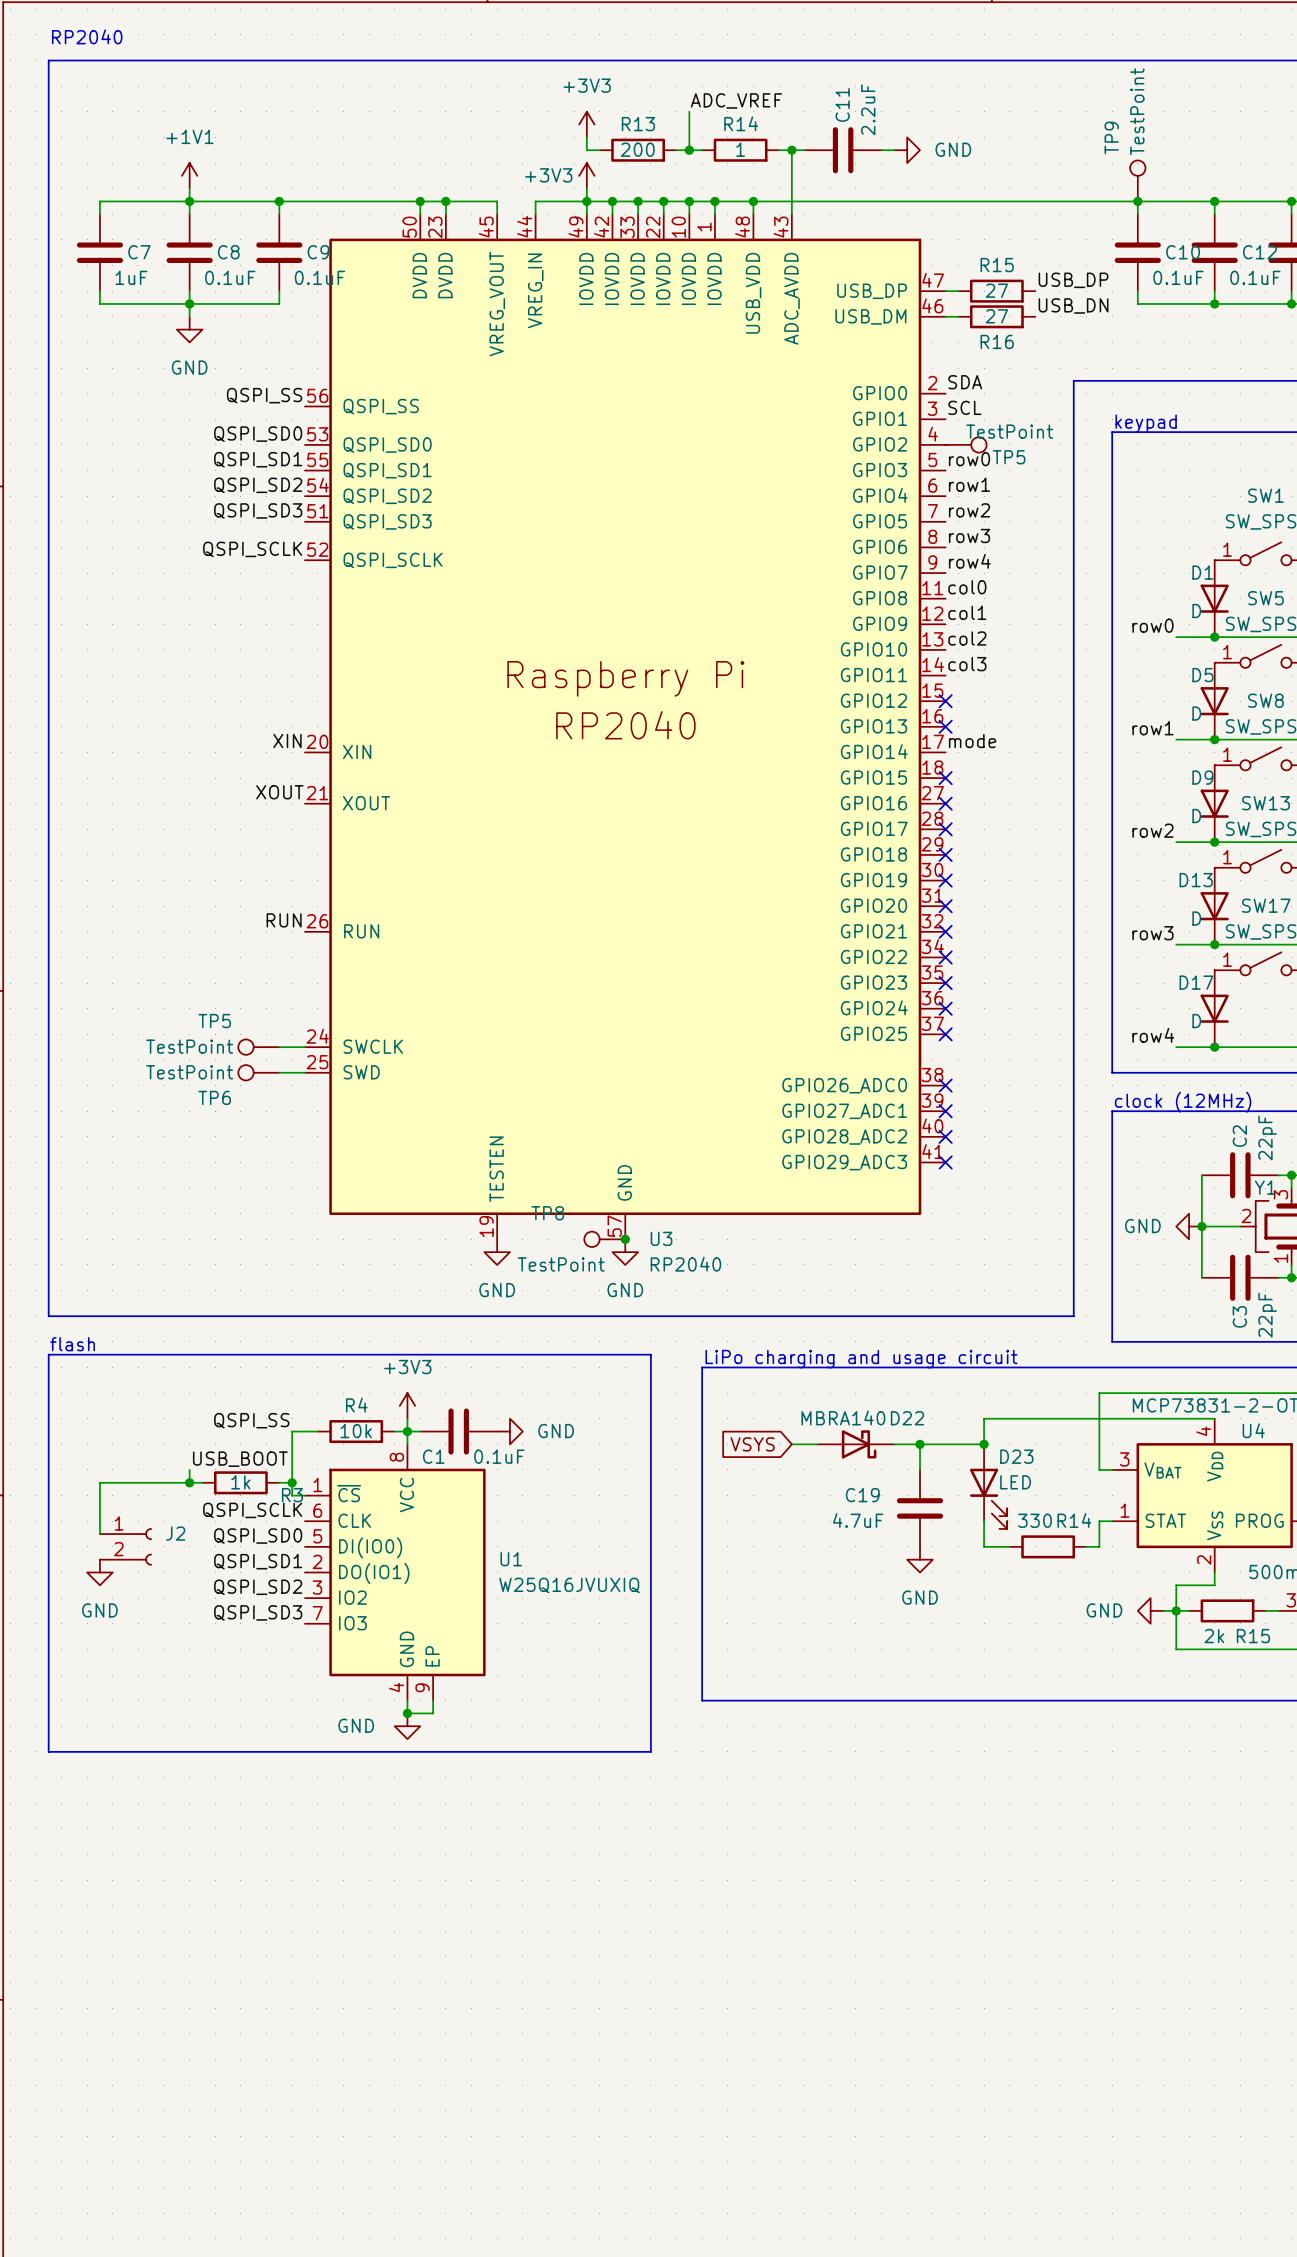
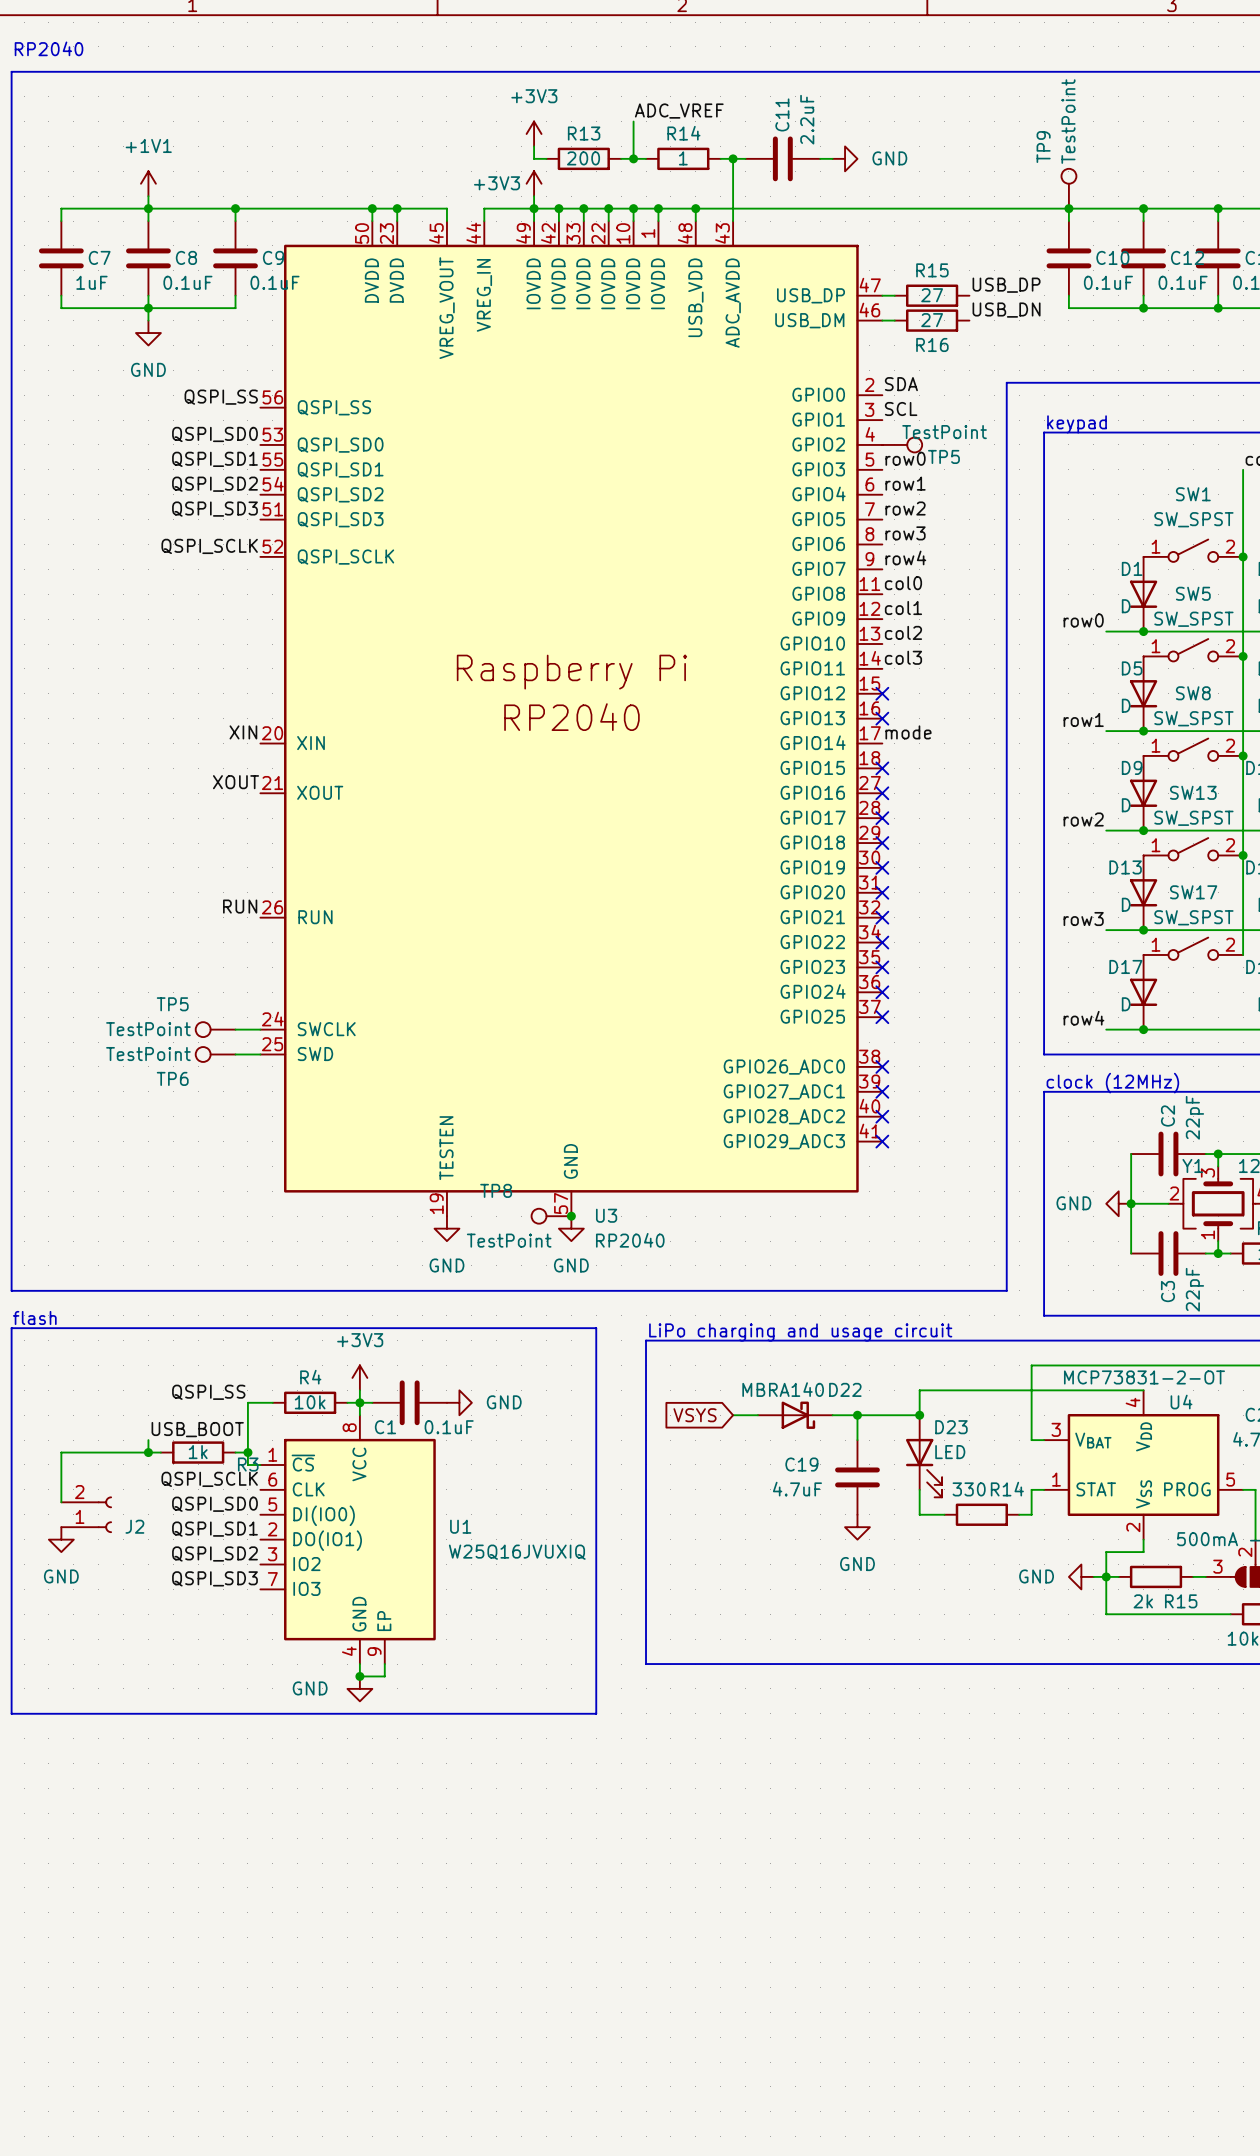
J2 flip: as is (144, 1546) -> up-down (104, 1514)

